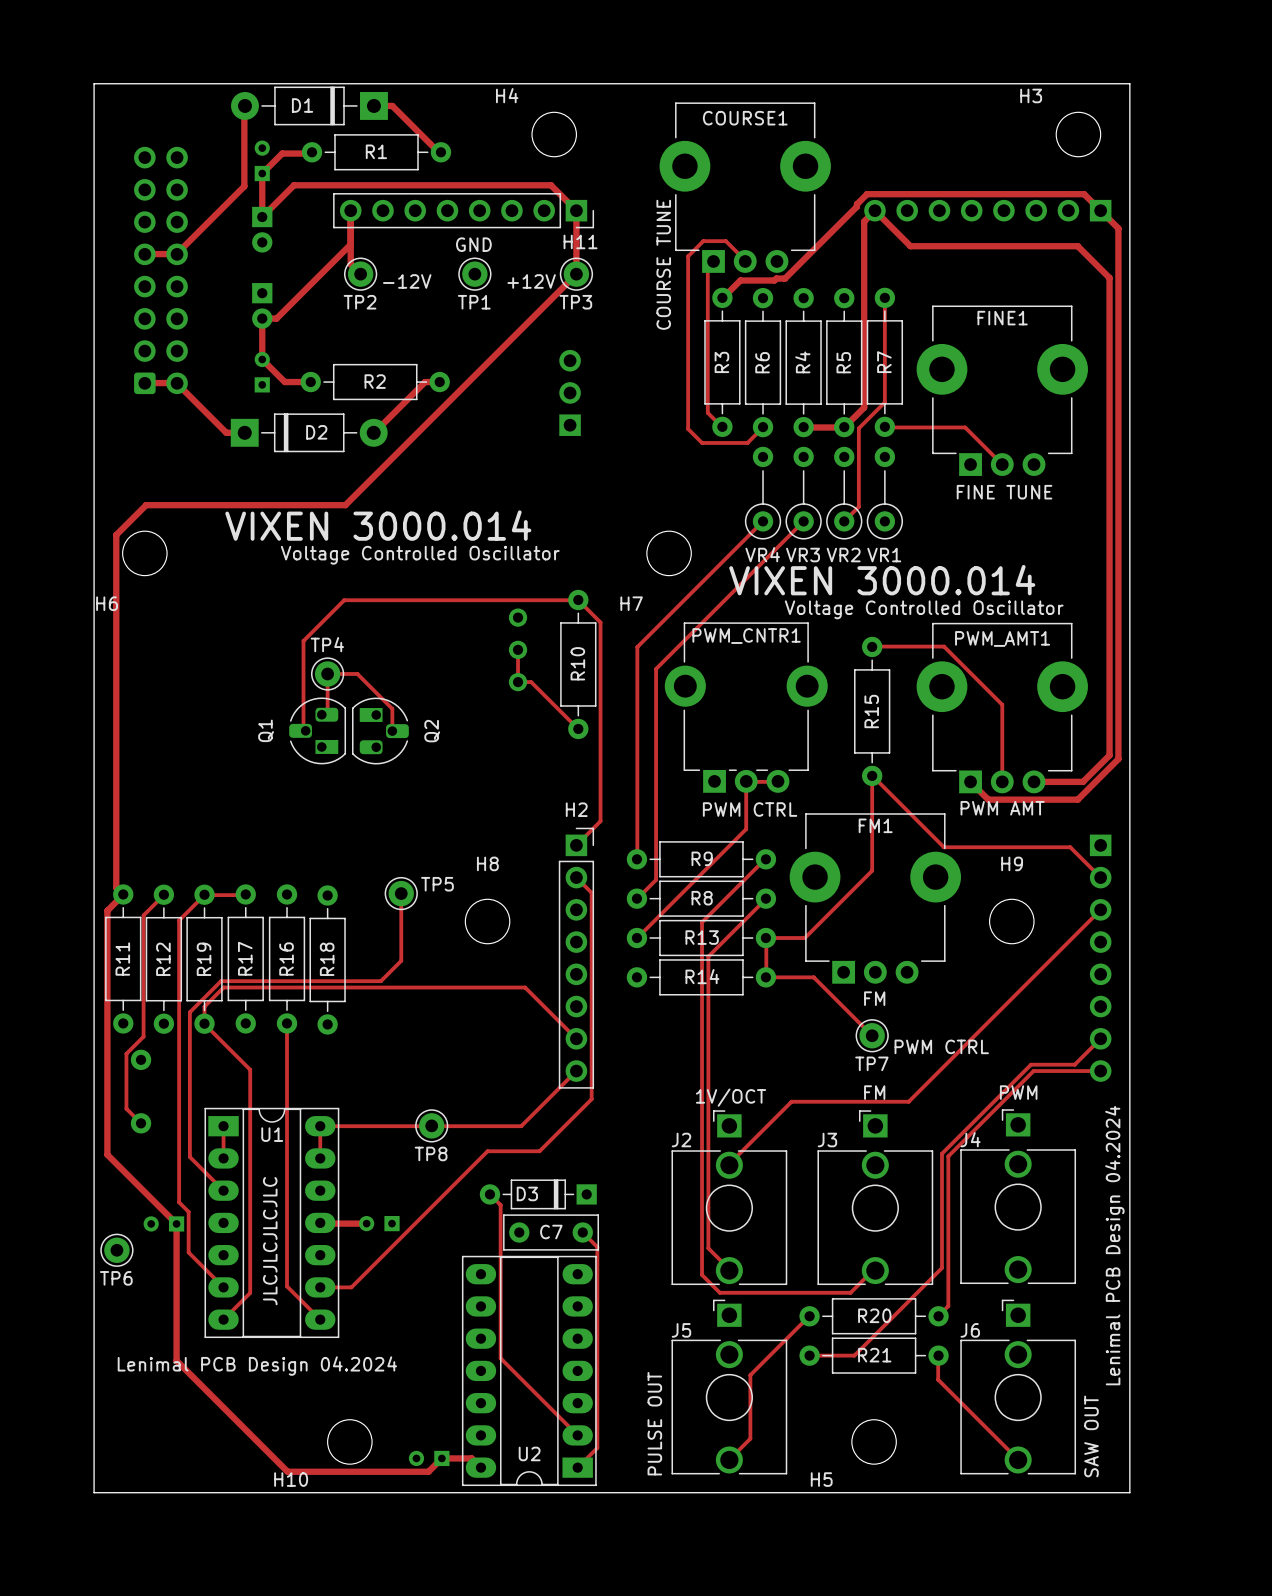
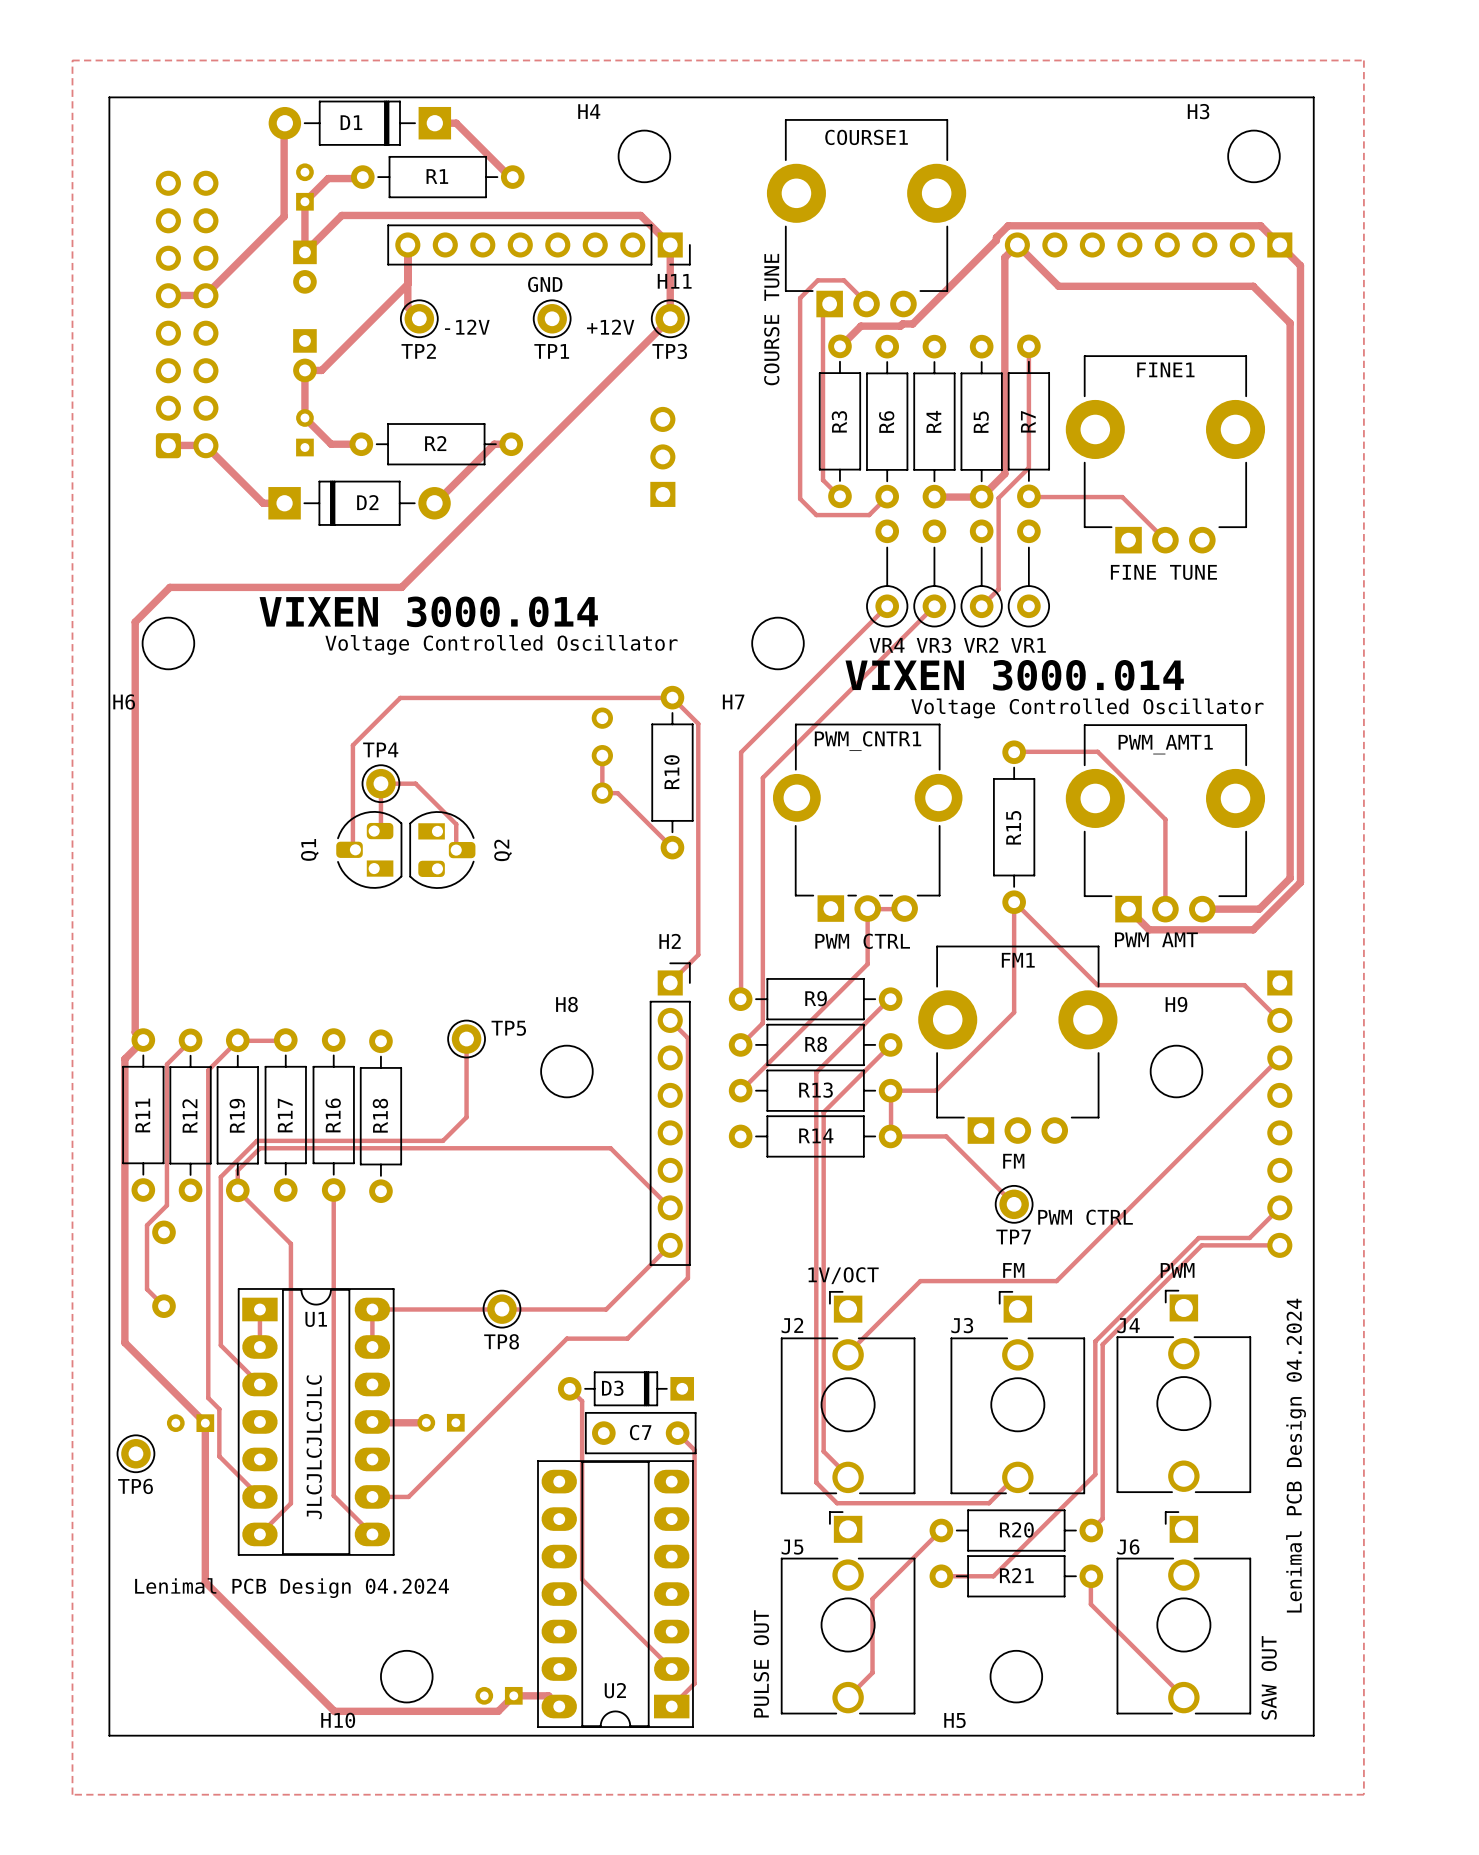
zone outline: none -> (72, 60) (1363, 60) (1363, 1794) (72, 1794) (72, 60)

